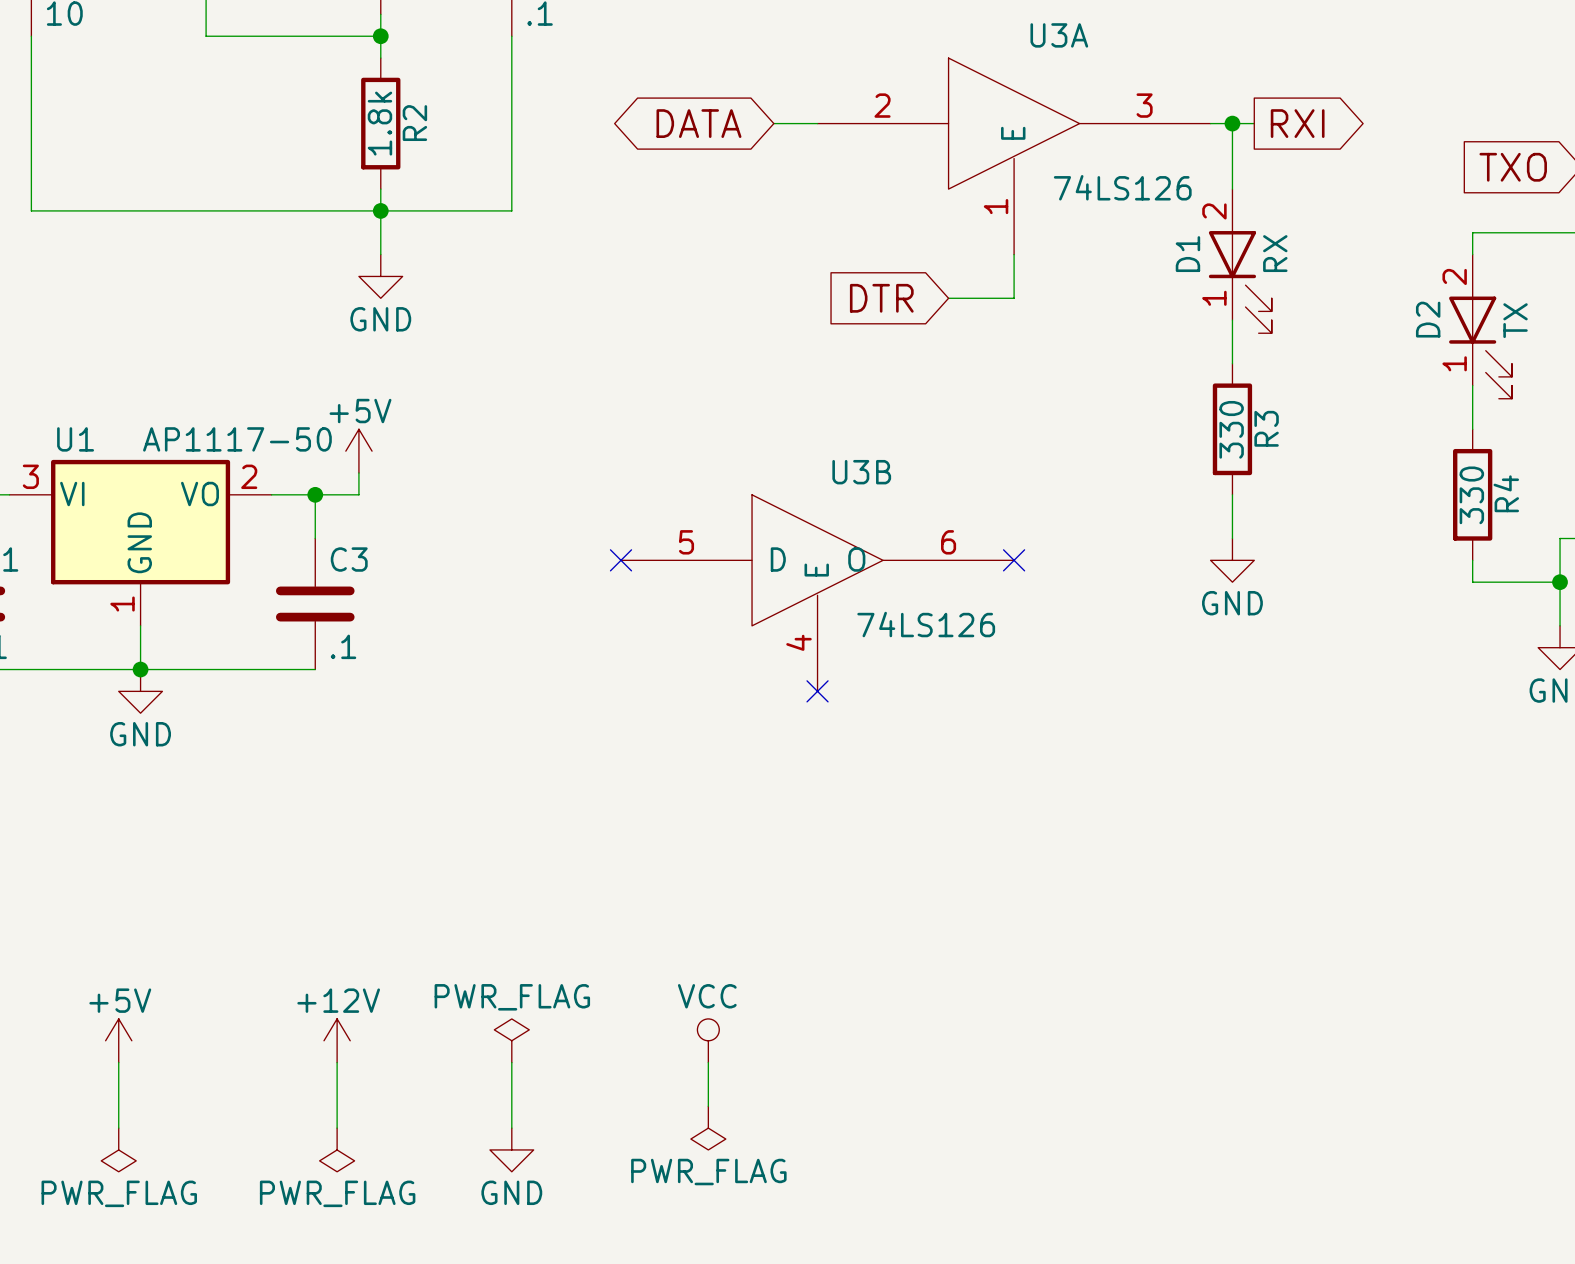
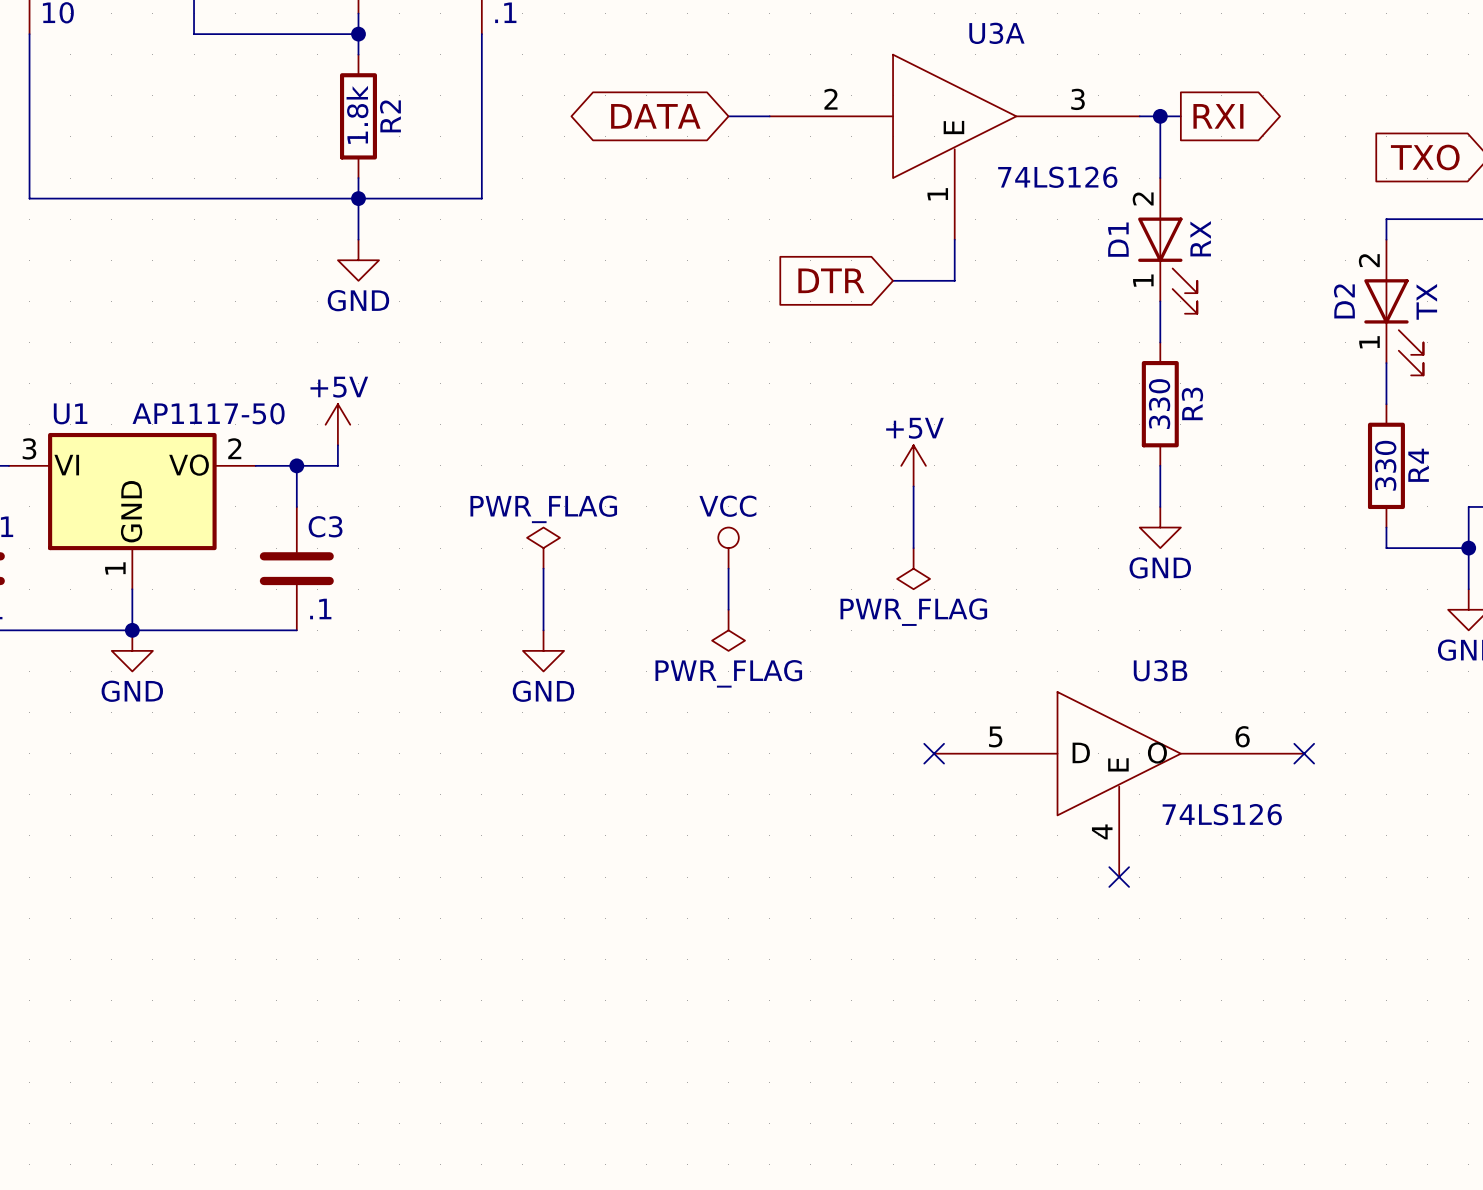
power symbol: none -> +5V (913, 465)
wire: none -> (913, 486) (913, 548)
no-connect mark: (620, 560) -> none
no-connect mark: (1014, 560) -> none
power symbol: none -> PWR_FLAG (543, 548)
power symbol: none -> VCC (728, 548)
U3B position: (817, 593) -> (1119, 784)
wire: none -> (543, 568) (543, 630)
wire: none -> (728, 568) (728, 609)
power symbol: none -> PWR_FLAG (913, 568)
power symbol: none -> PWR_FLAG (728, 630)
power symbol: none -> GND (543, 650)
no-connect mark: (817, 691) -> none
no-connect mark: none -> (934, 753)
no-connect mark: none -> (1304, 753)
no-connect mark: none -> (1119, 877)
power symbol: +5V (118, 1040) -> none
power symbol: +12V (337, 1040) -> none
power symbol: PWR_FLAG (511, 1040) -> none
power symbol: VCC (708, 1040) -> none
wire: (118, 1062) (118, 1128) -> none
wire: (337, 1062) (337, 1128) -> none
wire: (511, 1062) (511, 1128) -> none
wire: (708, 1062) (708, 1106) -> none
power symbol: PWR_FLAG (708, 1128) -> none
power symbol: PWR_FLAG (118, 1149) -> none
power symbol: PWR_FLAG (337, 1149) -> none
power symbol: GND (511, 1149) -> none

